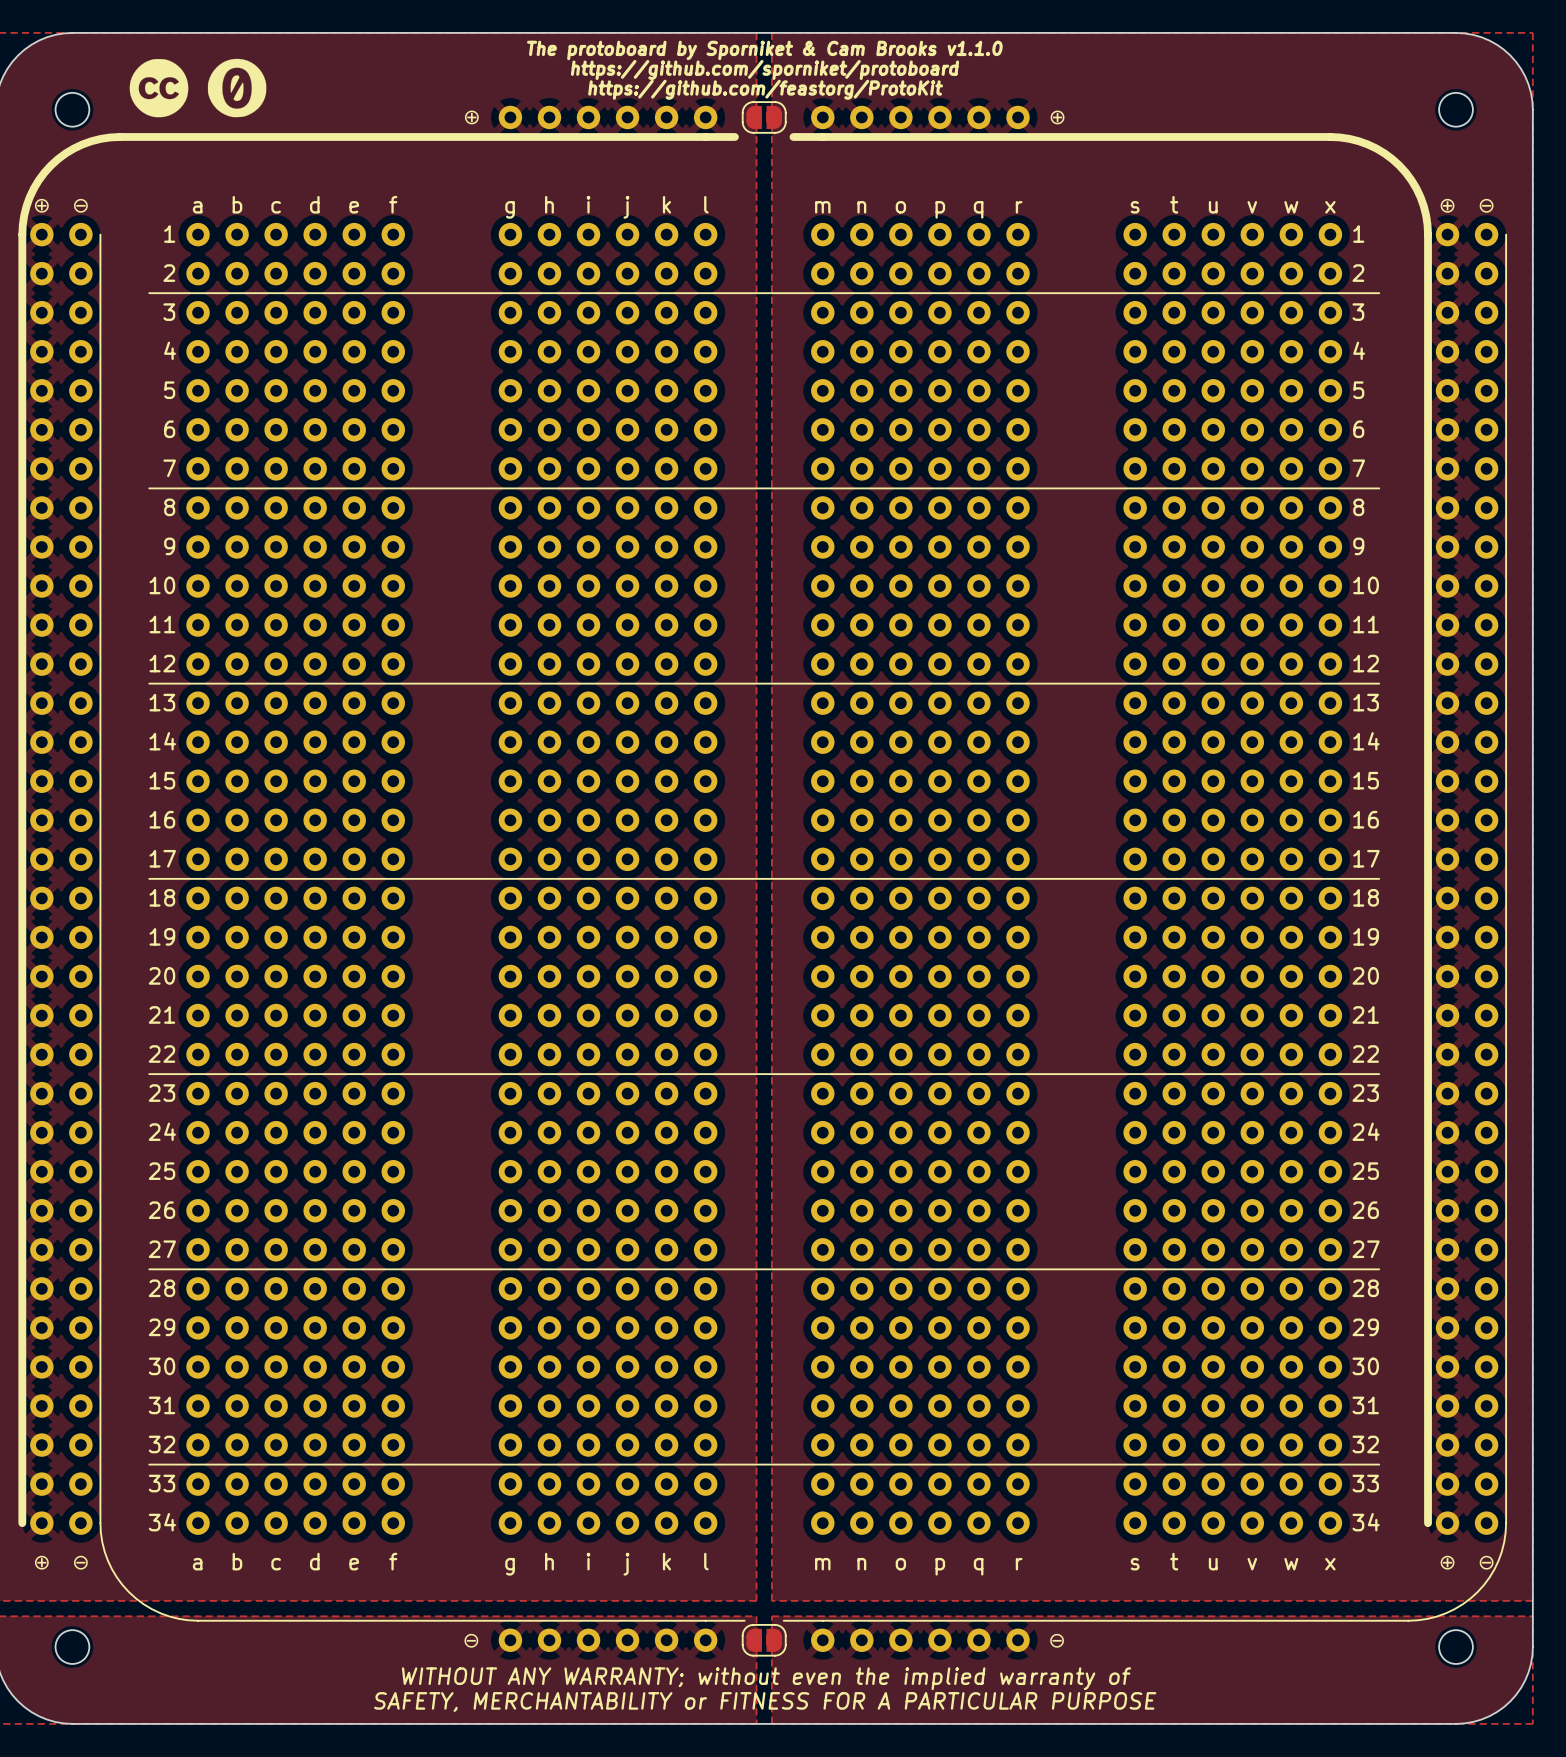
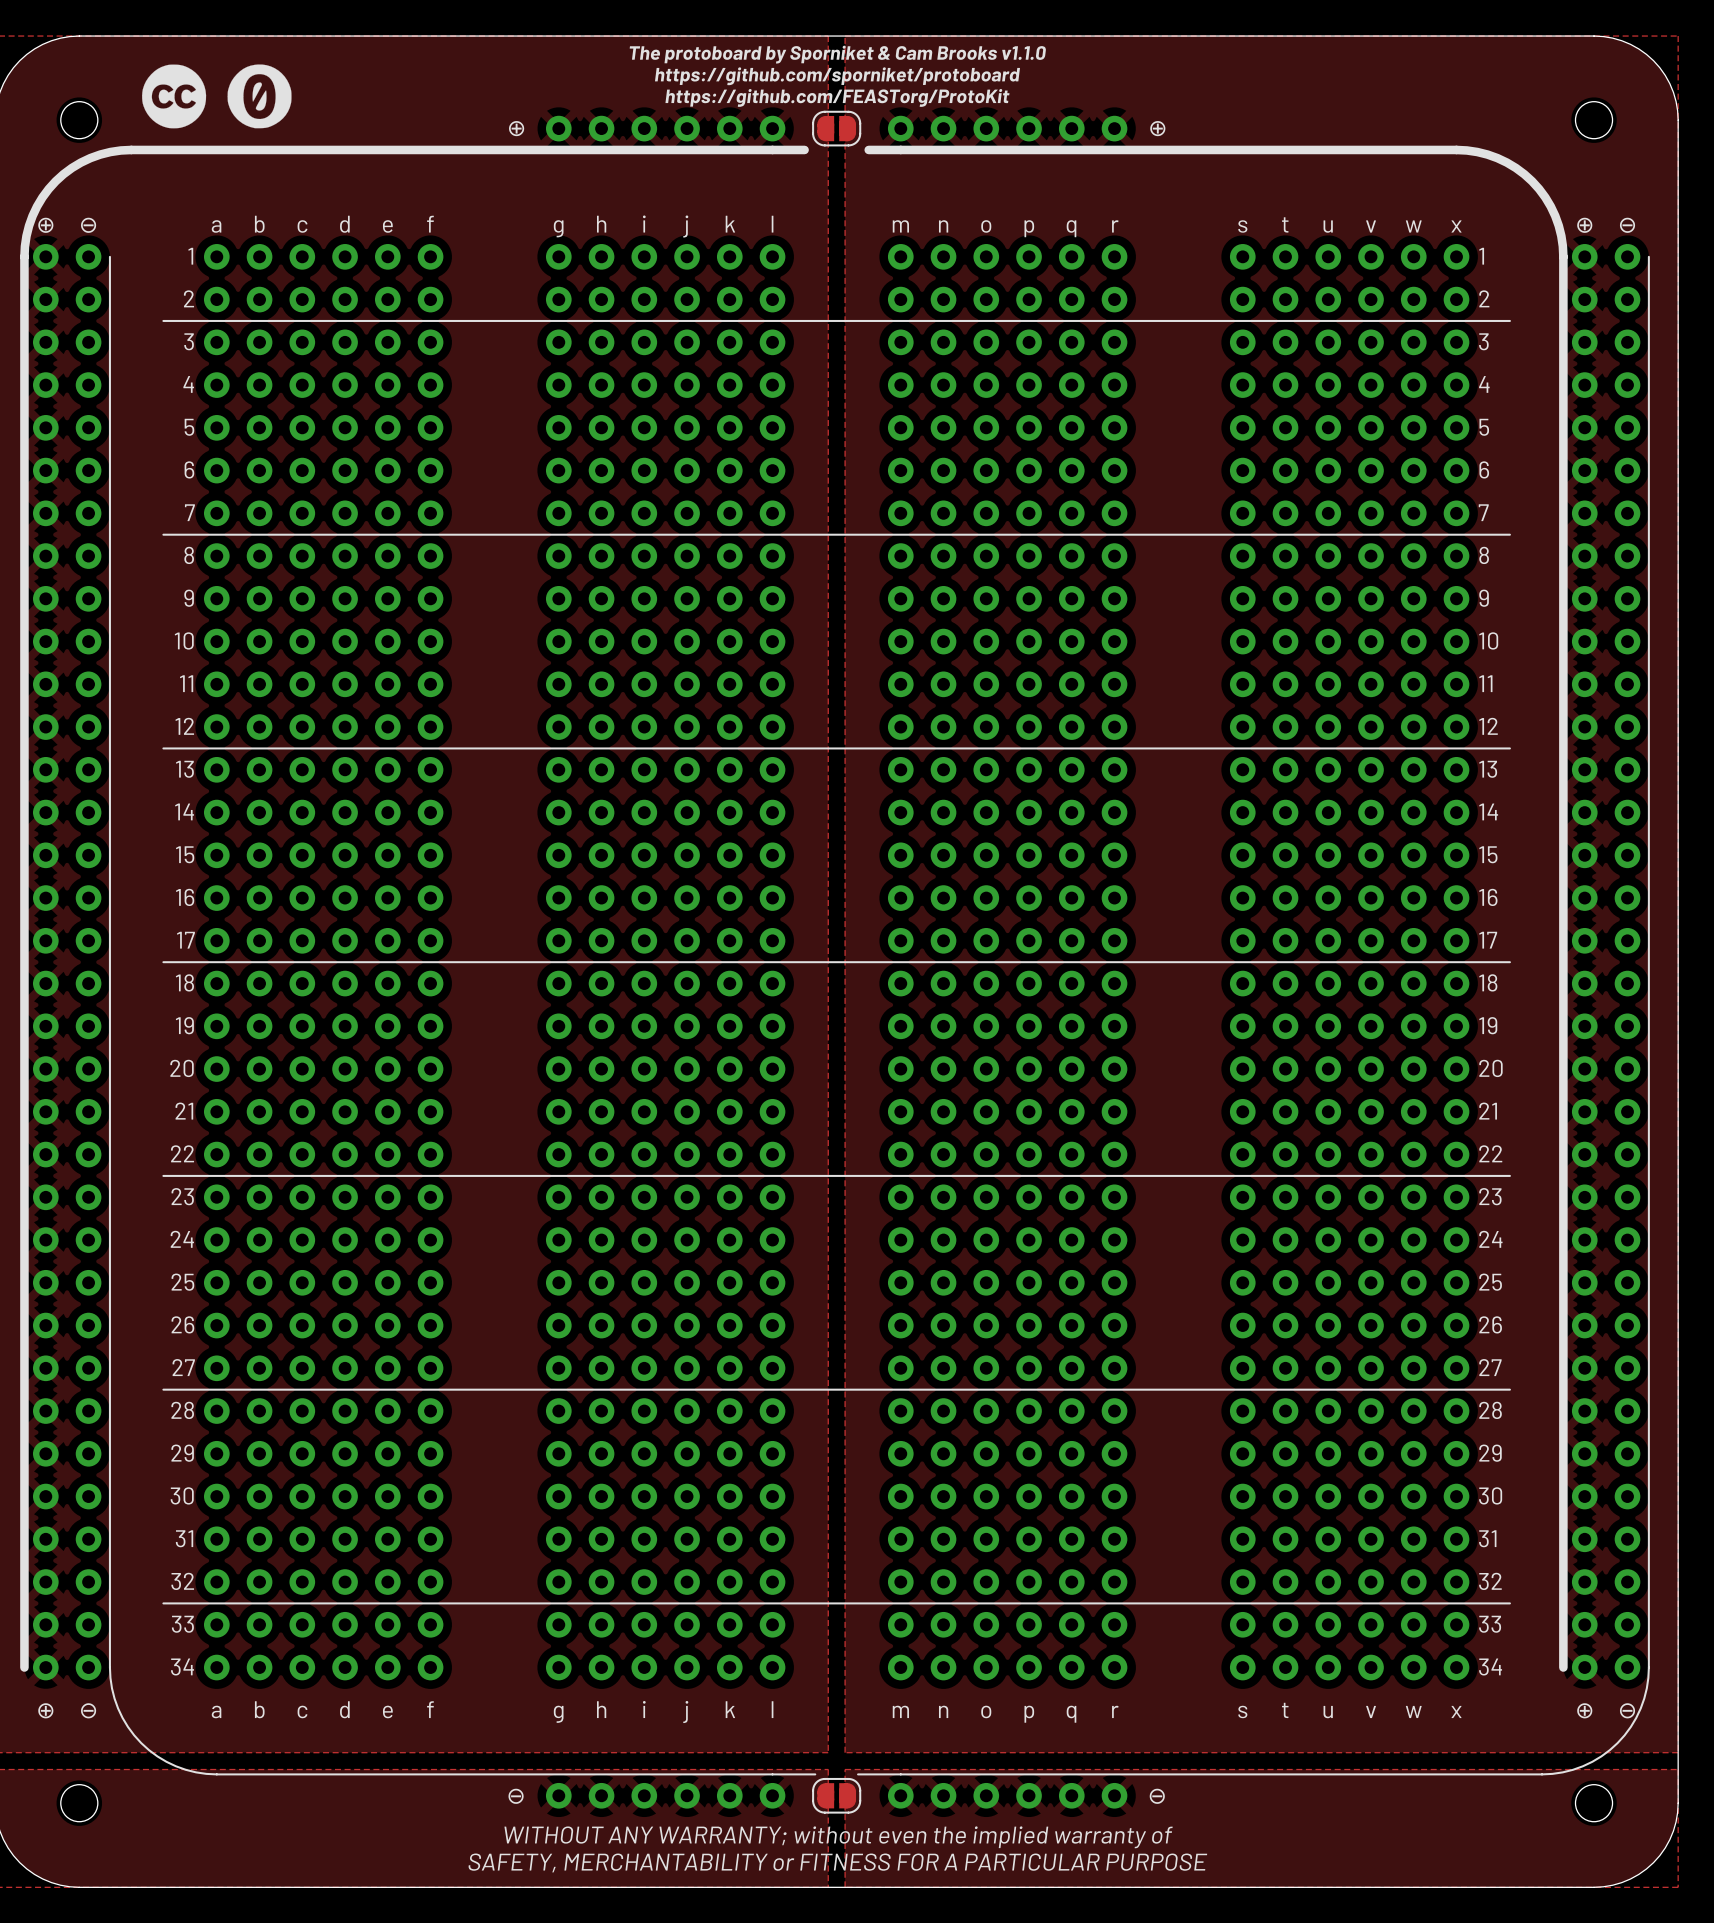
text: https://github.com/feastorg/ProtoKit (765, 89) -> https://github.com/FEASTorg/ProtoKit (837, 97)

